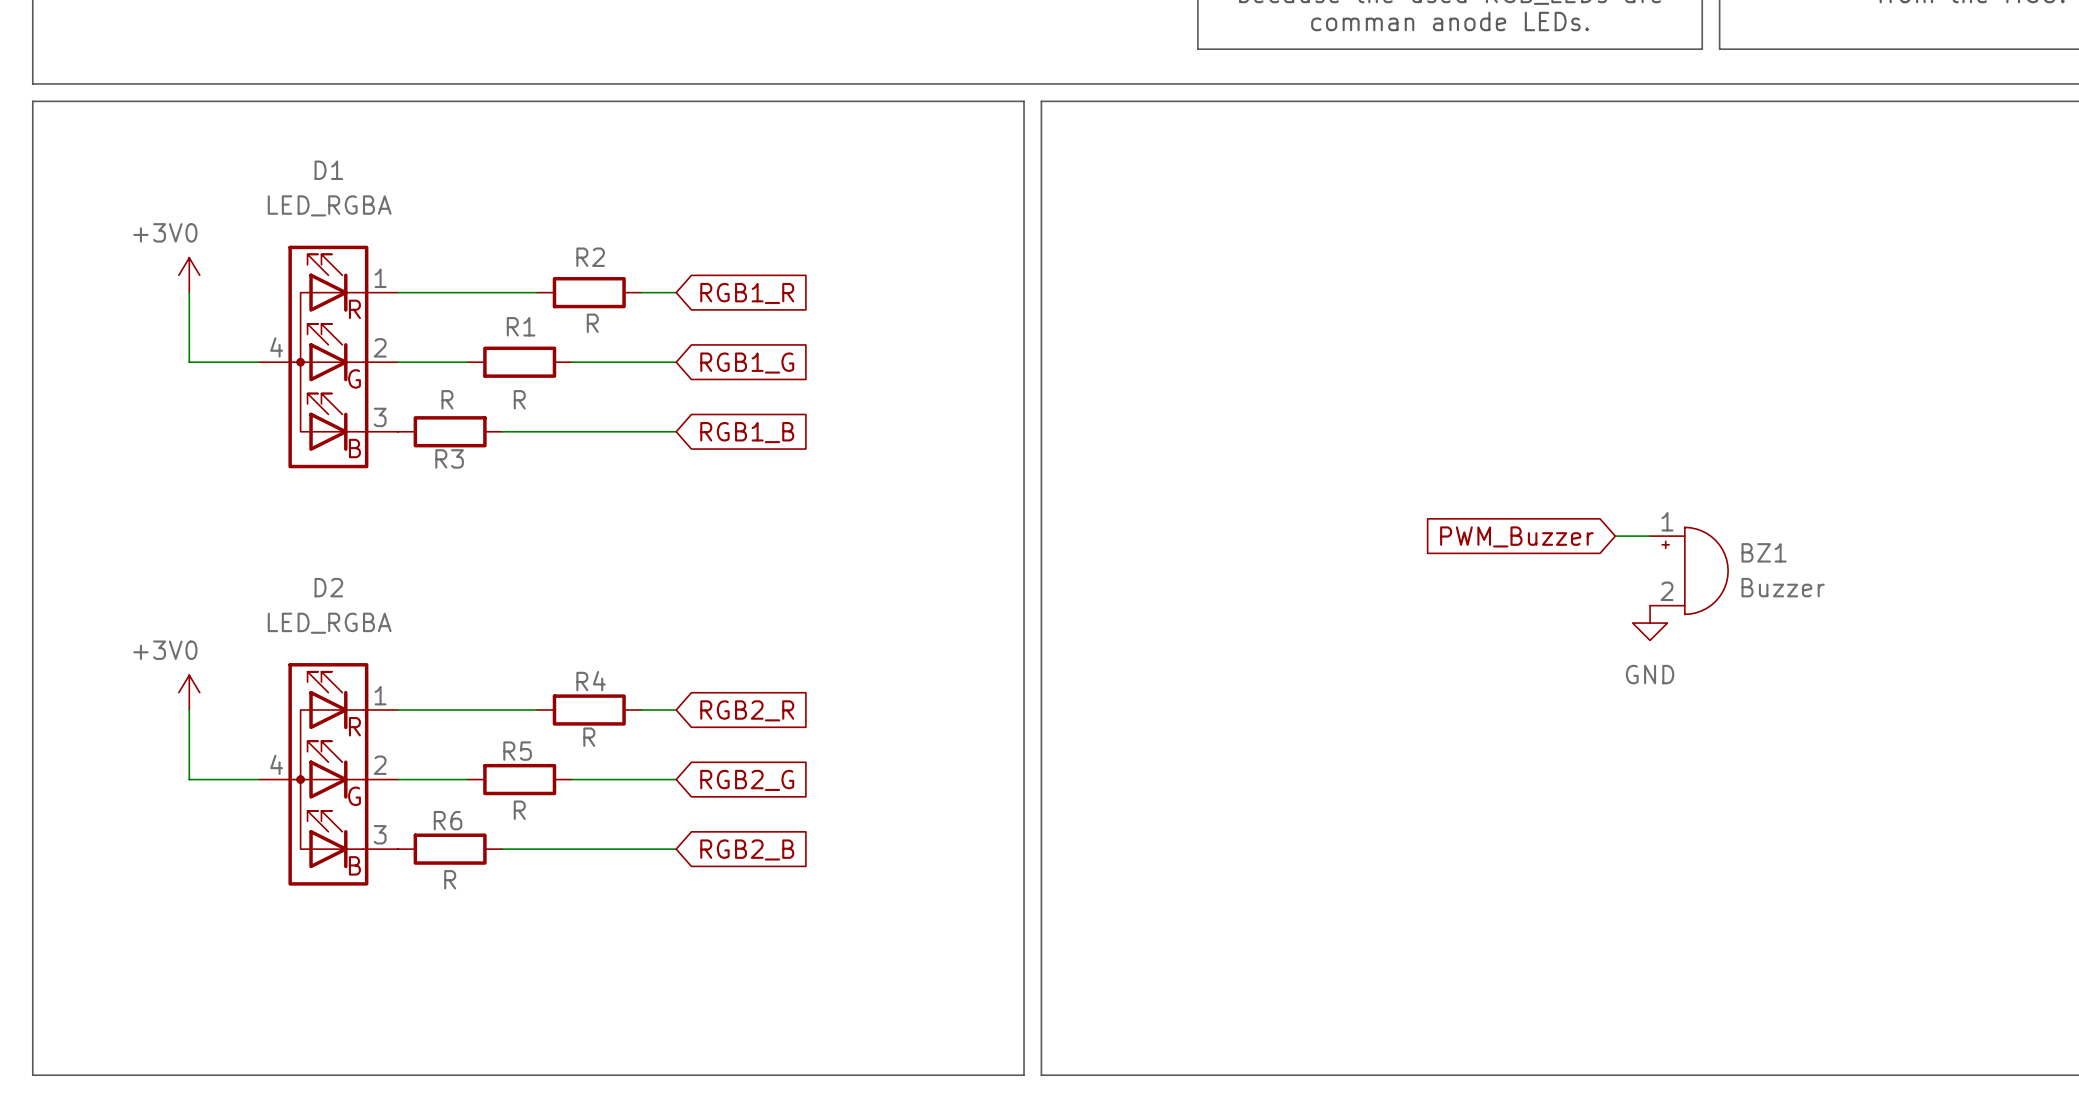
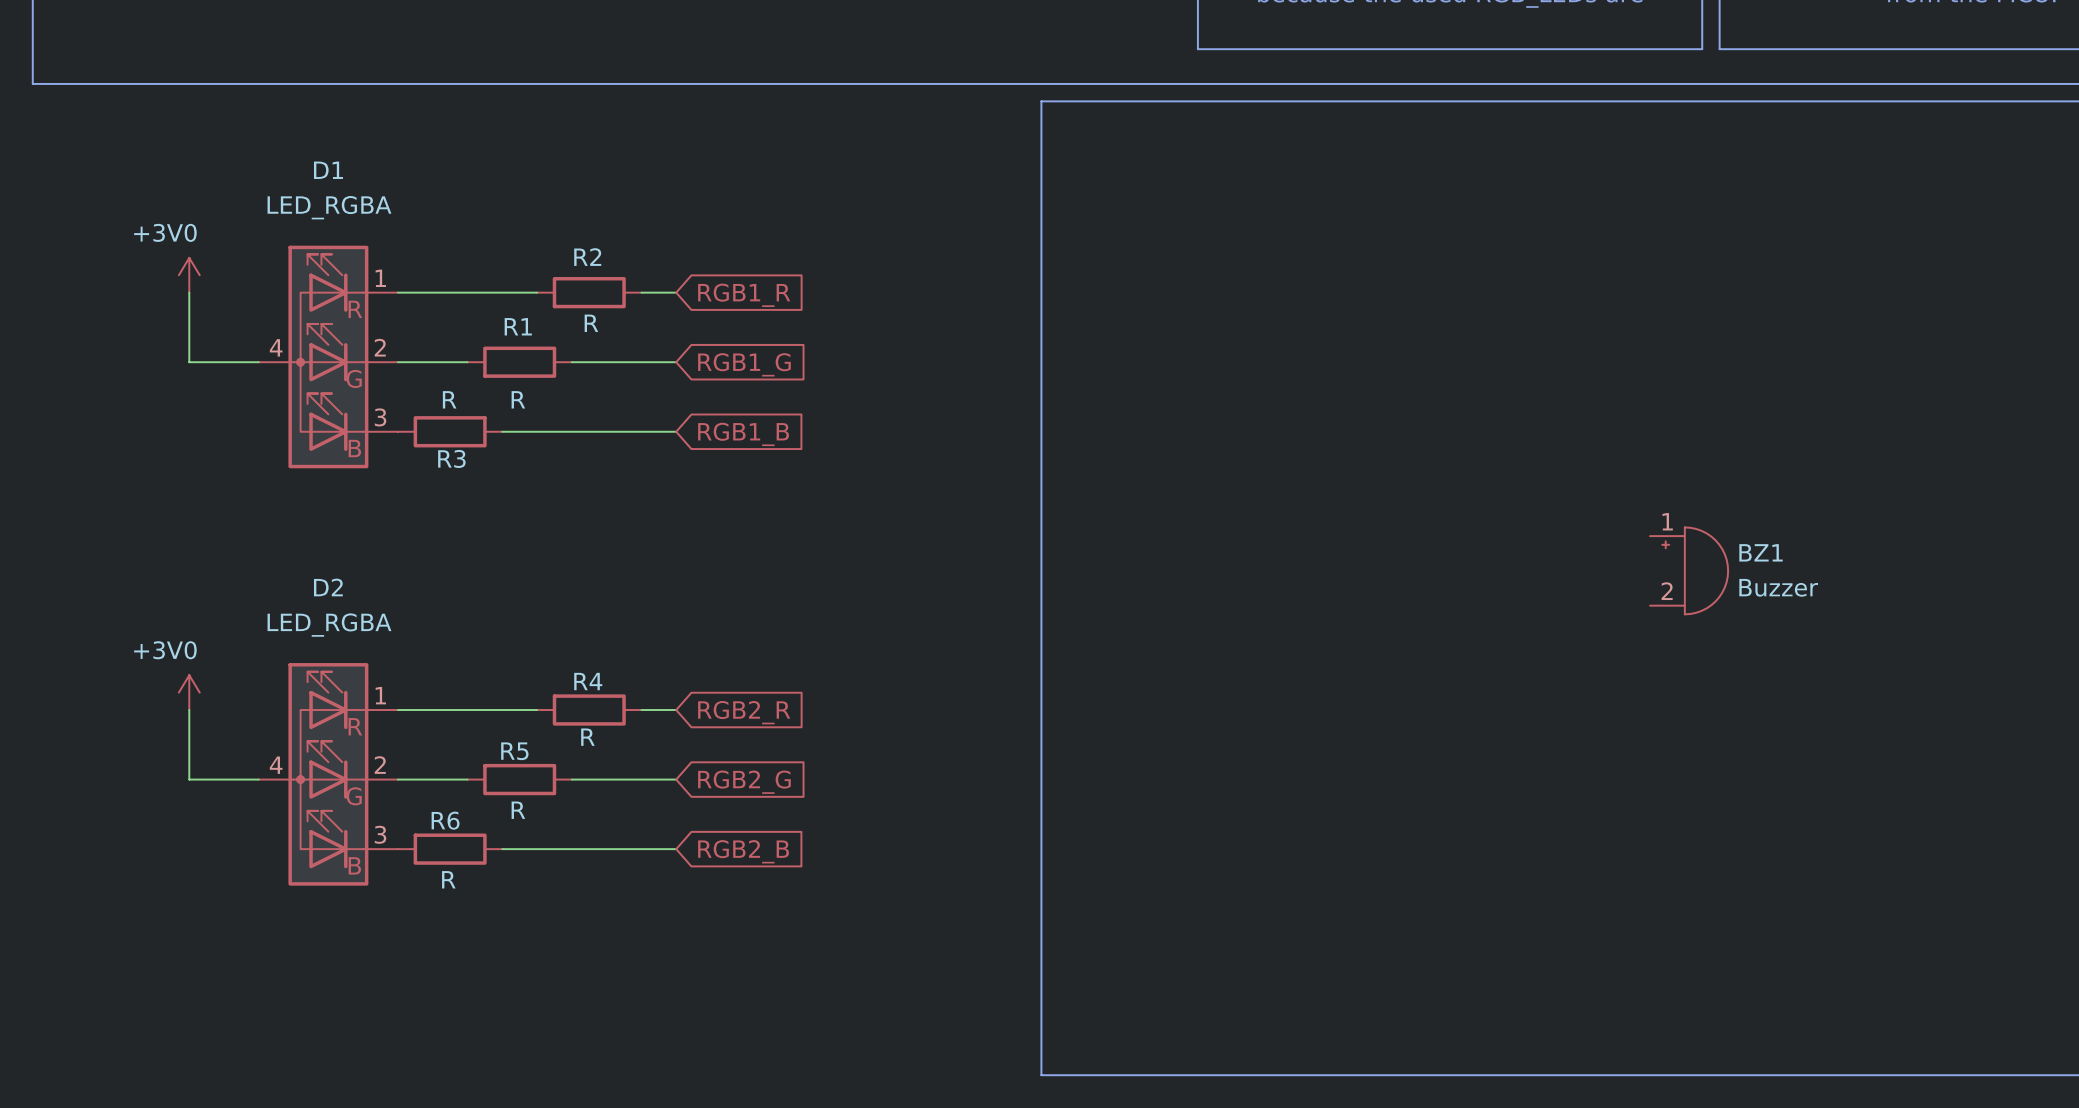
text: comman anode LEDs. (1450, 21) -> none
line: (32, 101) (1024, 101) (1024, 1075) (32, 1075) (32, 101) -> none
global label: PWM_Buzzer (1516, 536) -> none
wire: (1615, 536) (1650, 536) -> none
power symbol: GND (1650, 623) -> none

